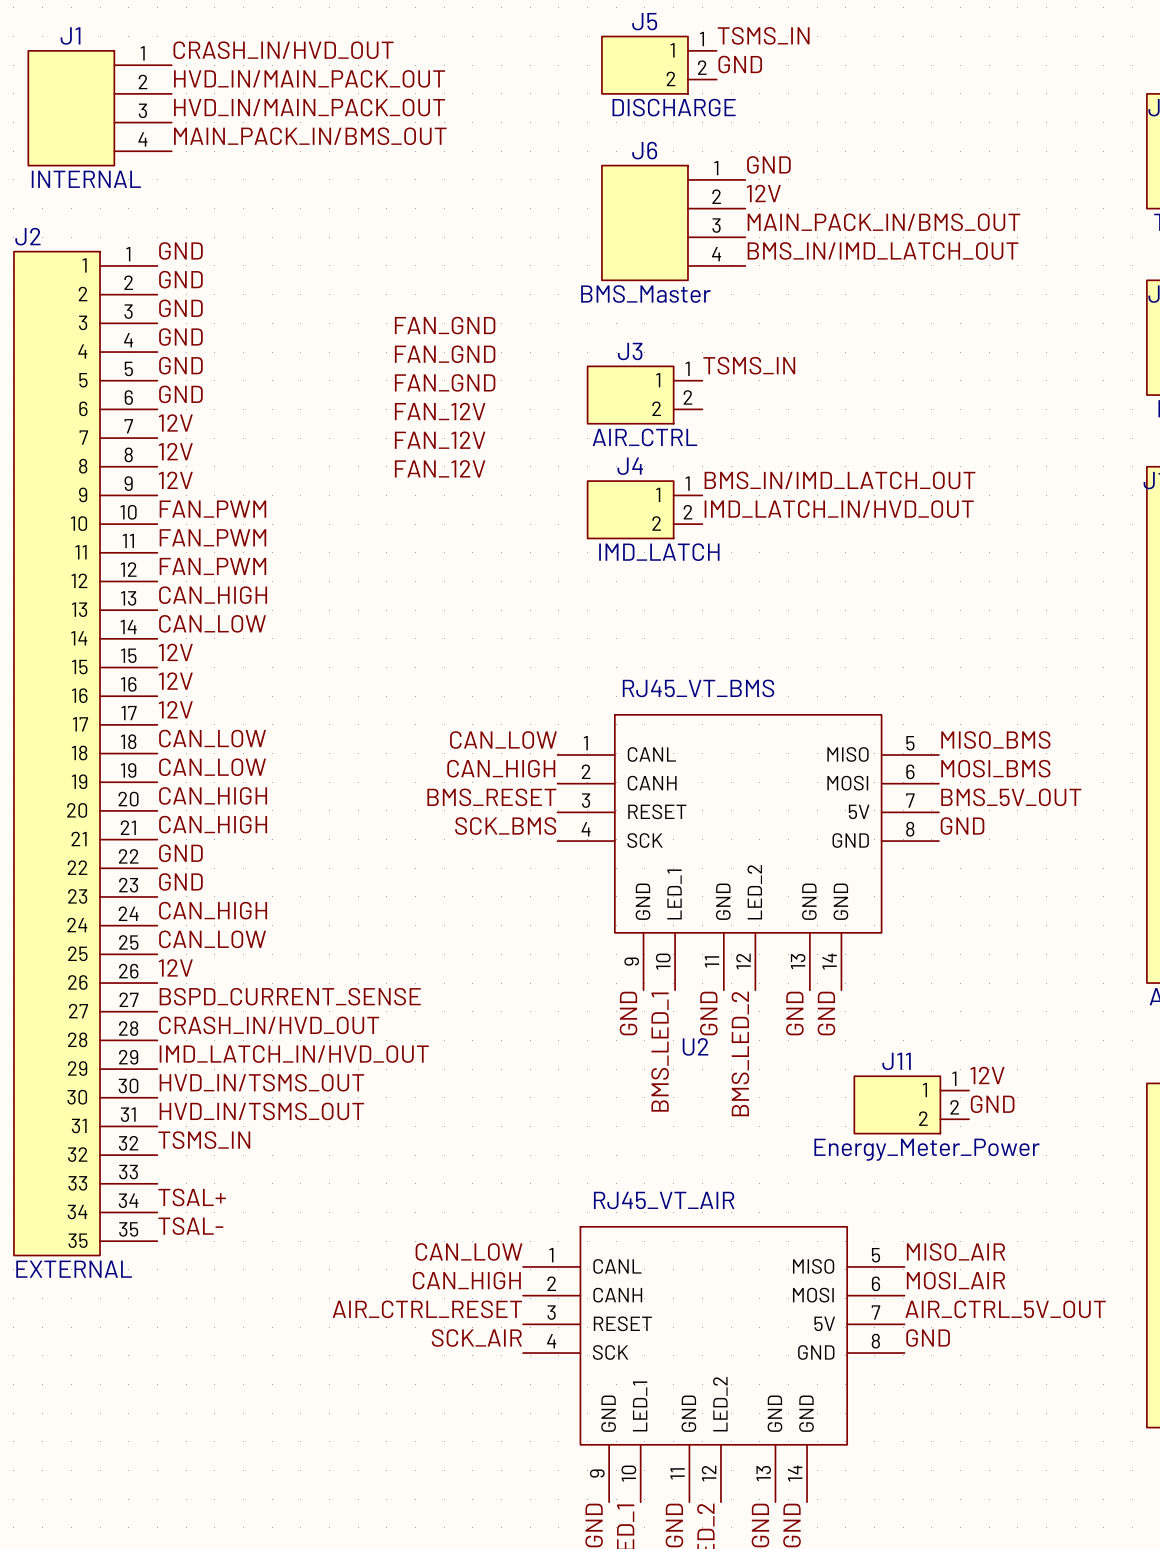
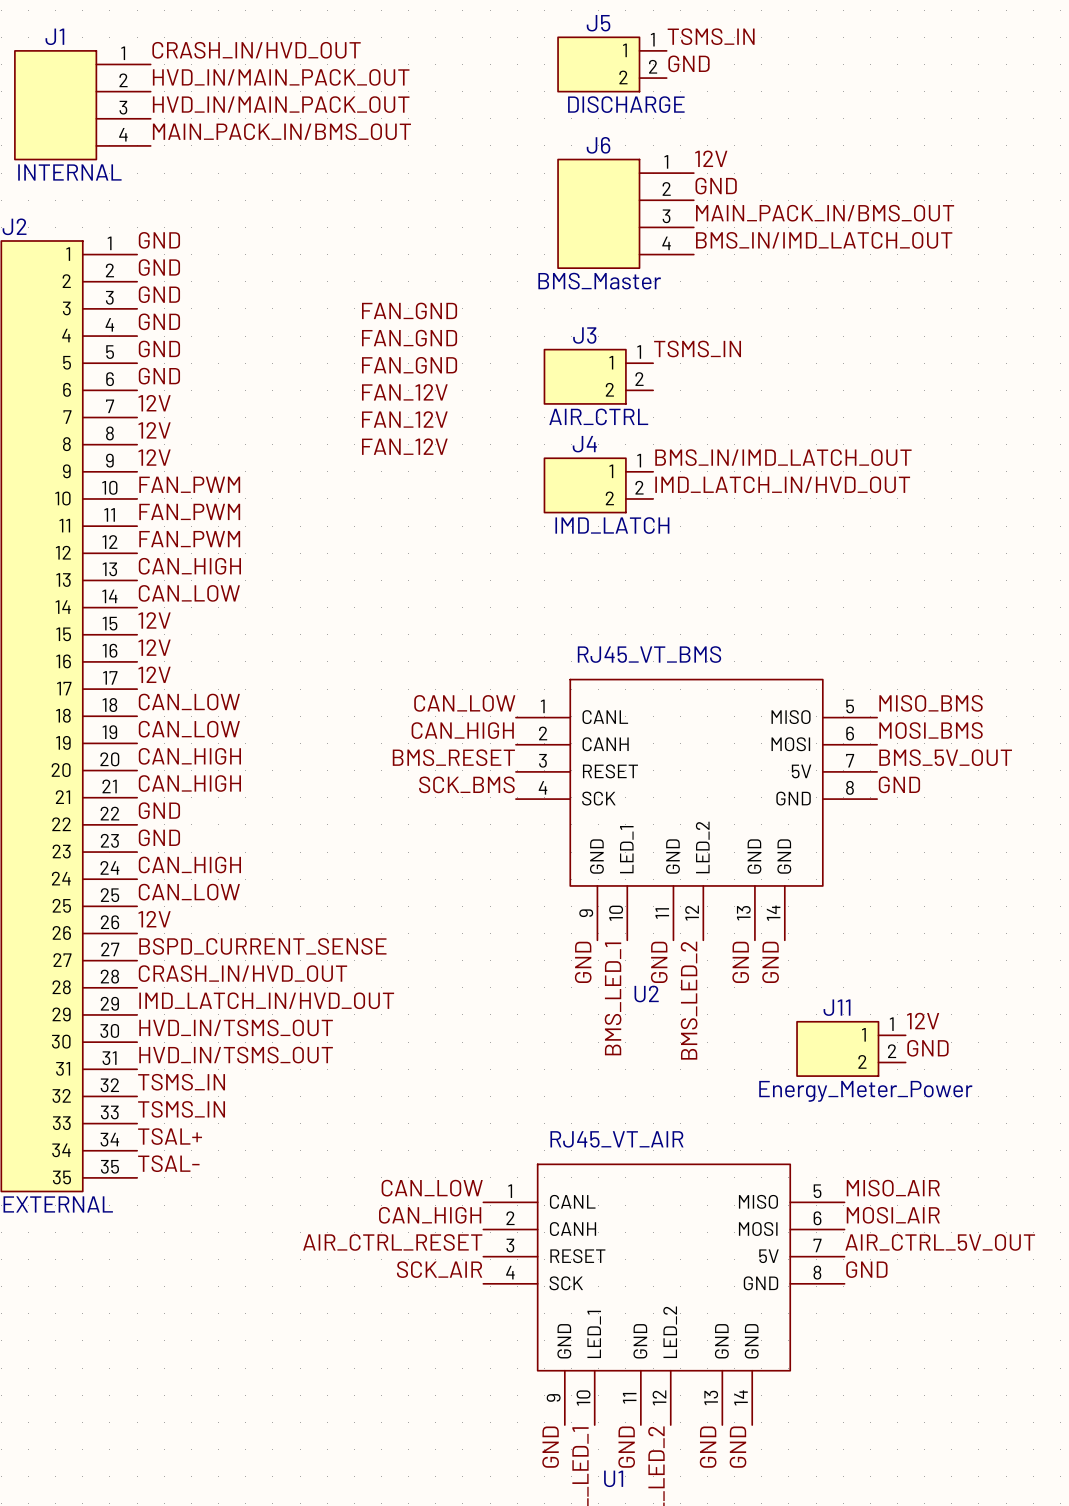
label: GND (768, 164) -> 12V (711, 158)
label: 12V (763, 193) -> GND (716, 186)
label: none -> TSMS_IN (181, 1109)

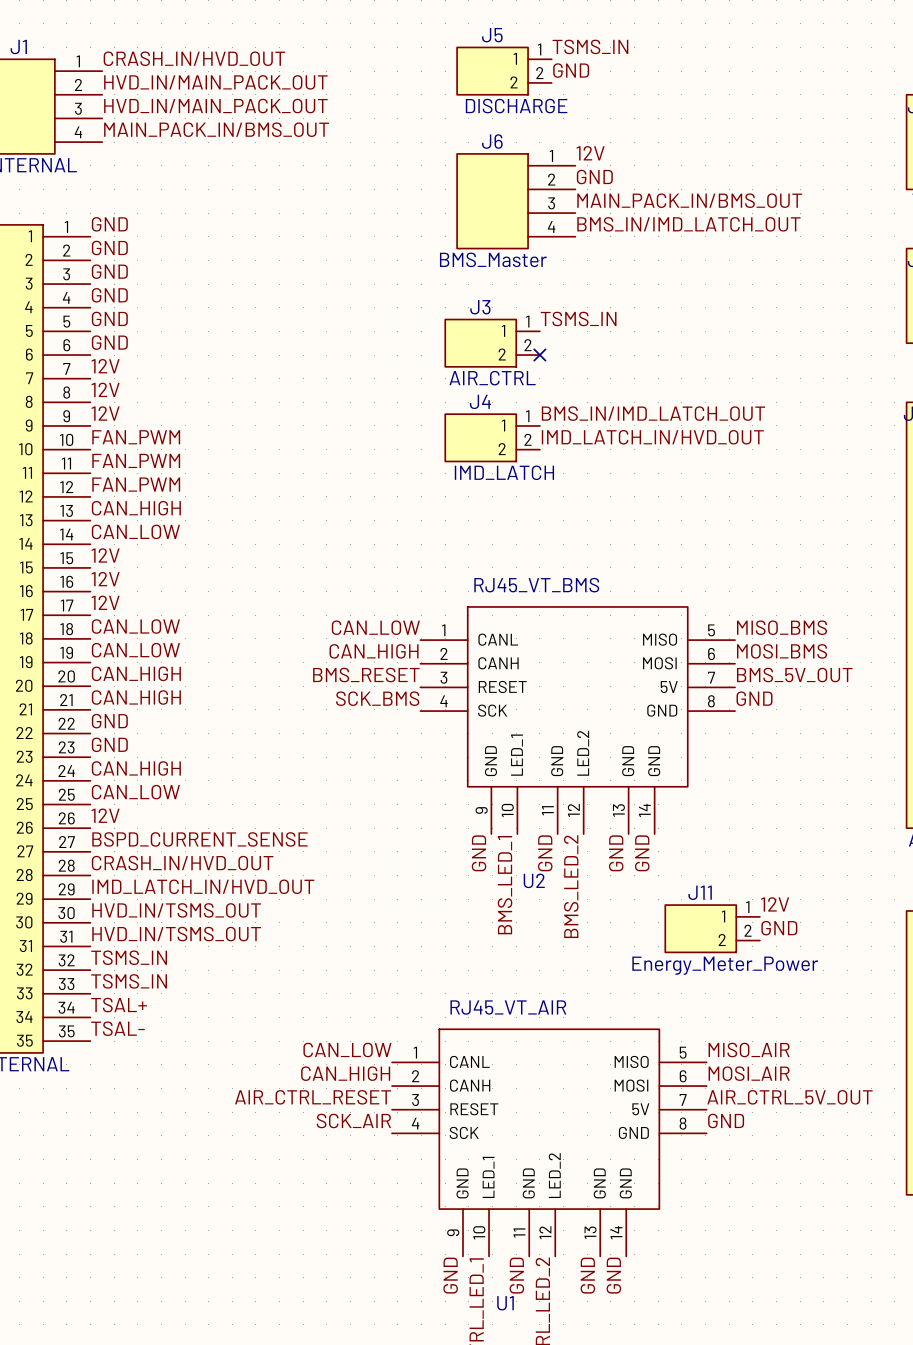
label: FAN_GND (409, 310) -> none
label: FAN_GND (409, 338) -> none
label: FAN_GND (409, 365) -> none
no-connect mark: none -> (539, 355)
label: FAN_12V (404, 392) -> none
label: FAN_12V (404, 419) -> none
label: FAN_12V (404, 446) -> none

